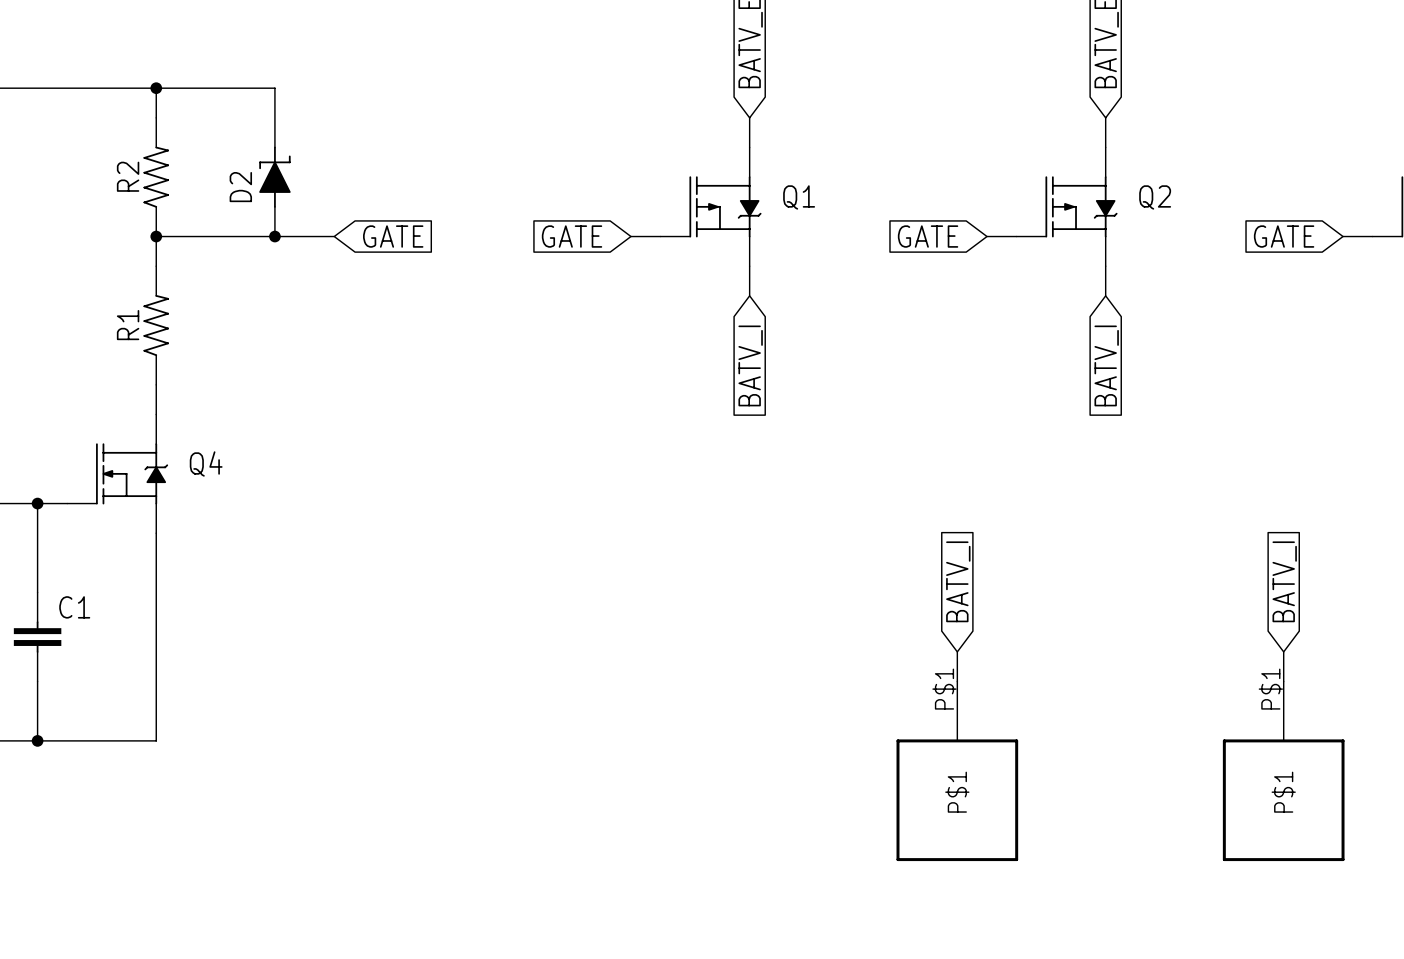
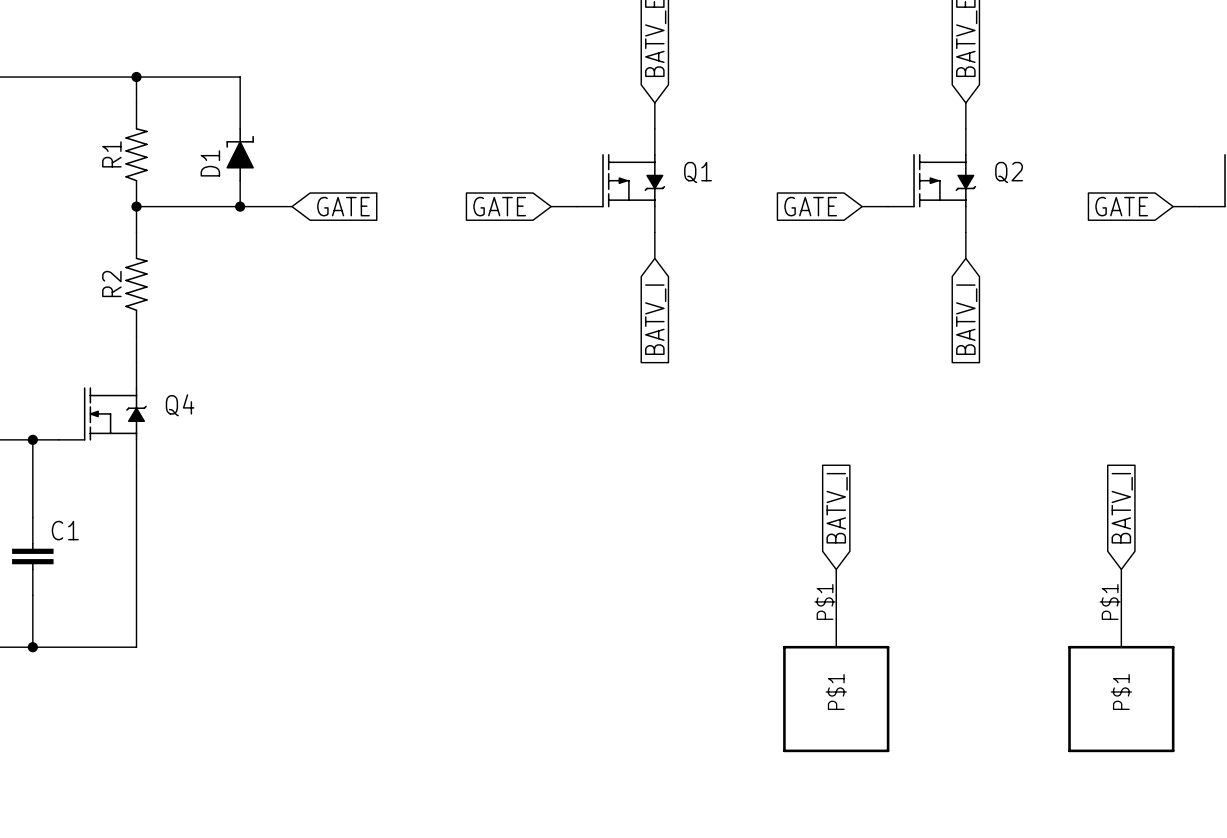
R2 name: R2 (128, 176) -> R1 (111, 154)
D2 name: D2 (240, 187) -> D1 (210, 163)
R1 name: R1 (128, 325) -> R2 (111, 283)

